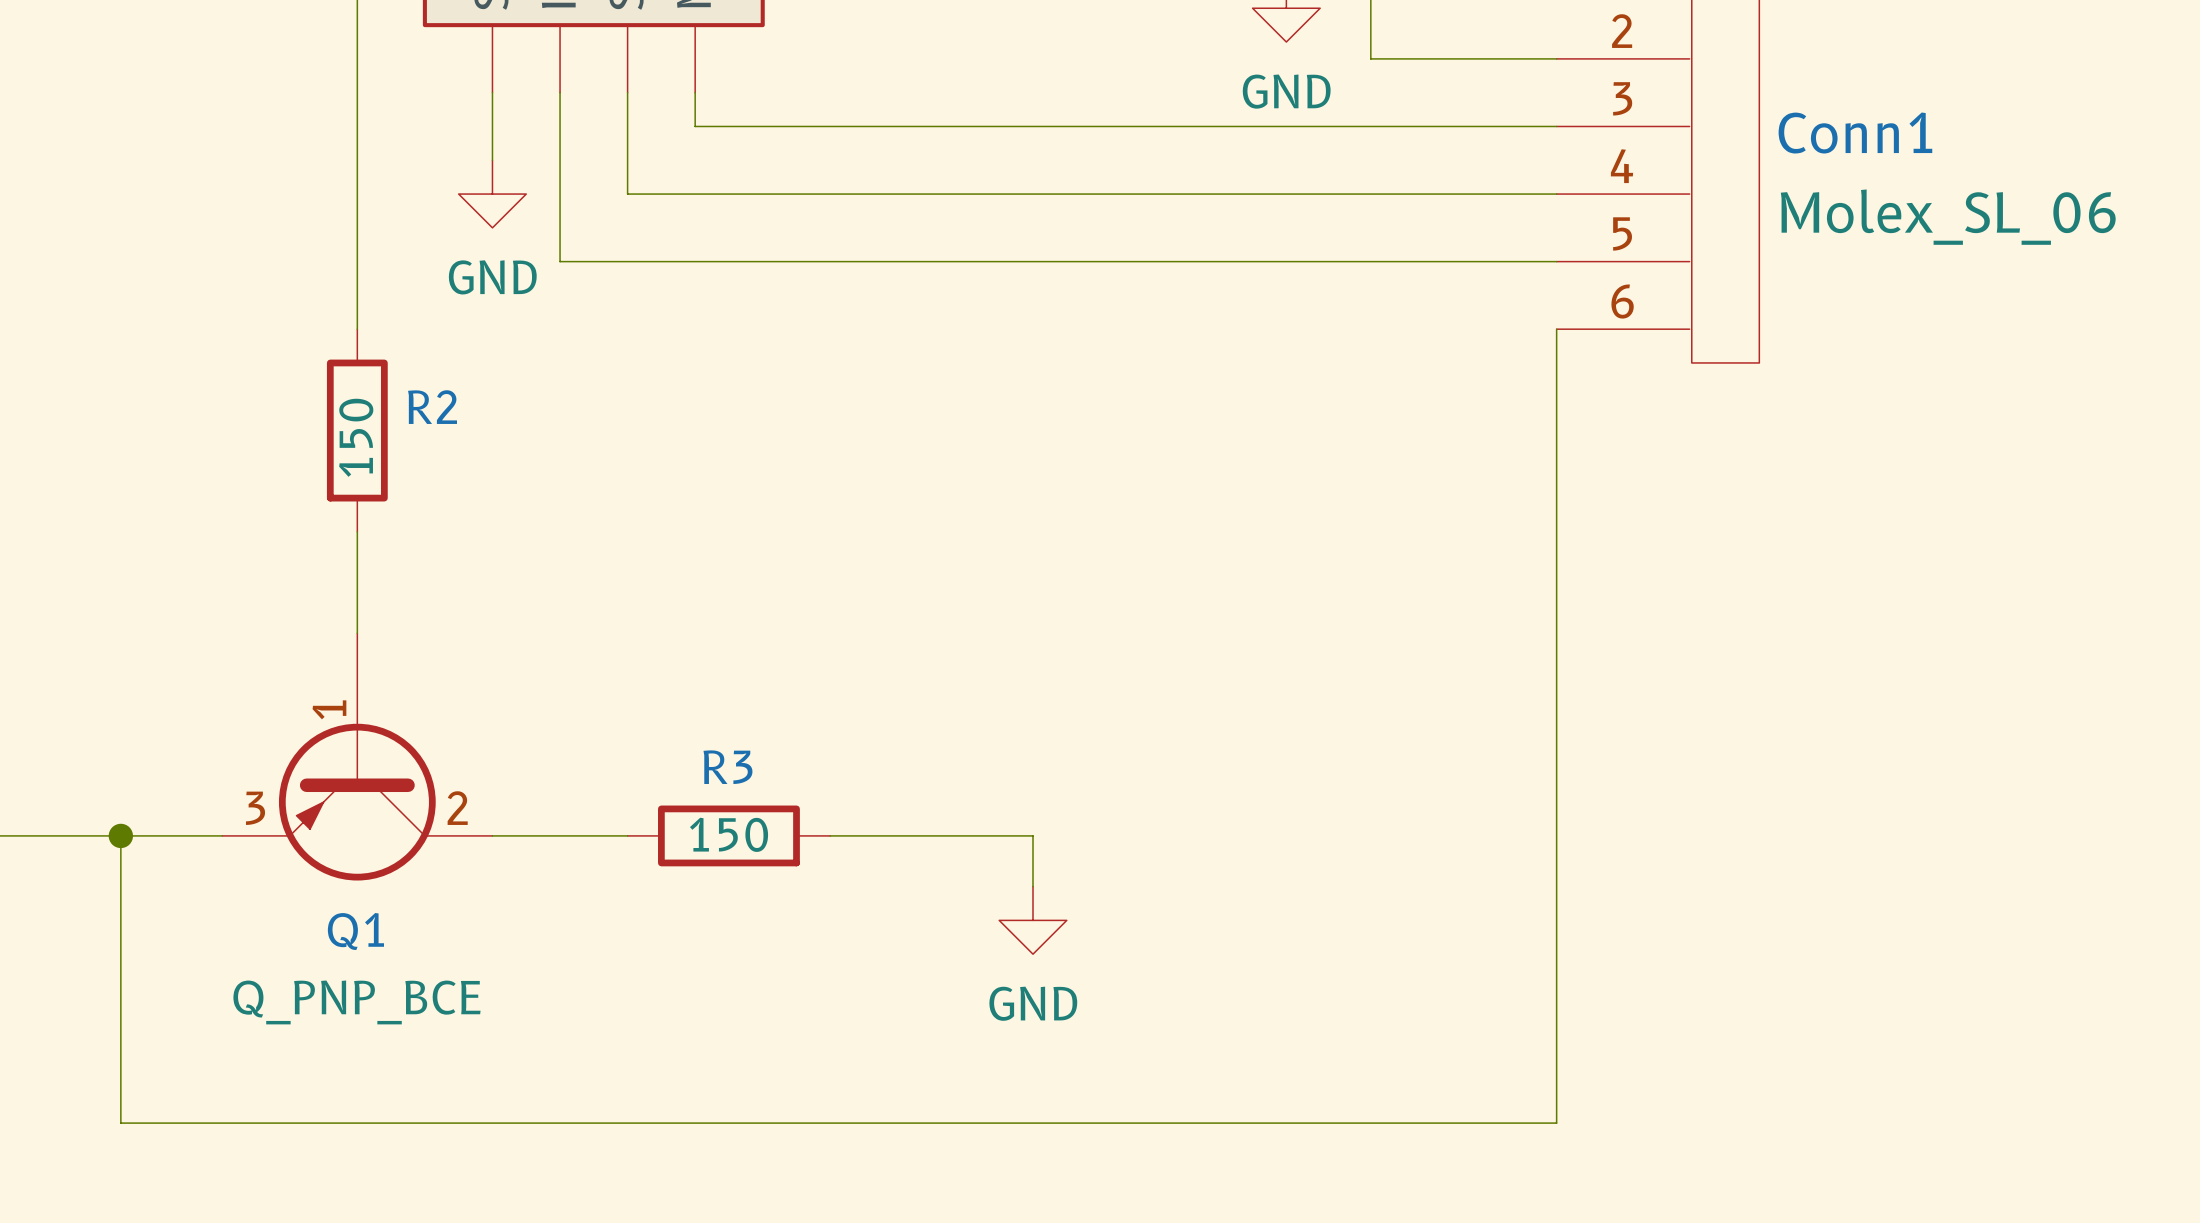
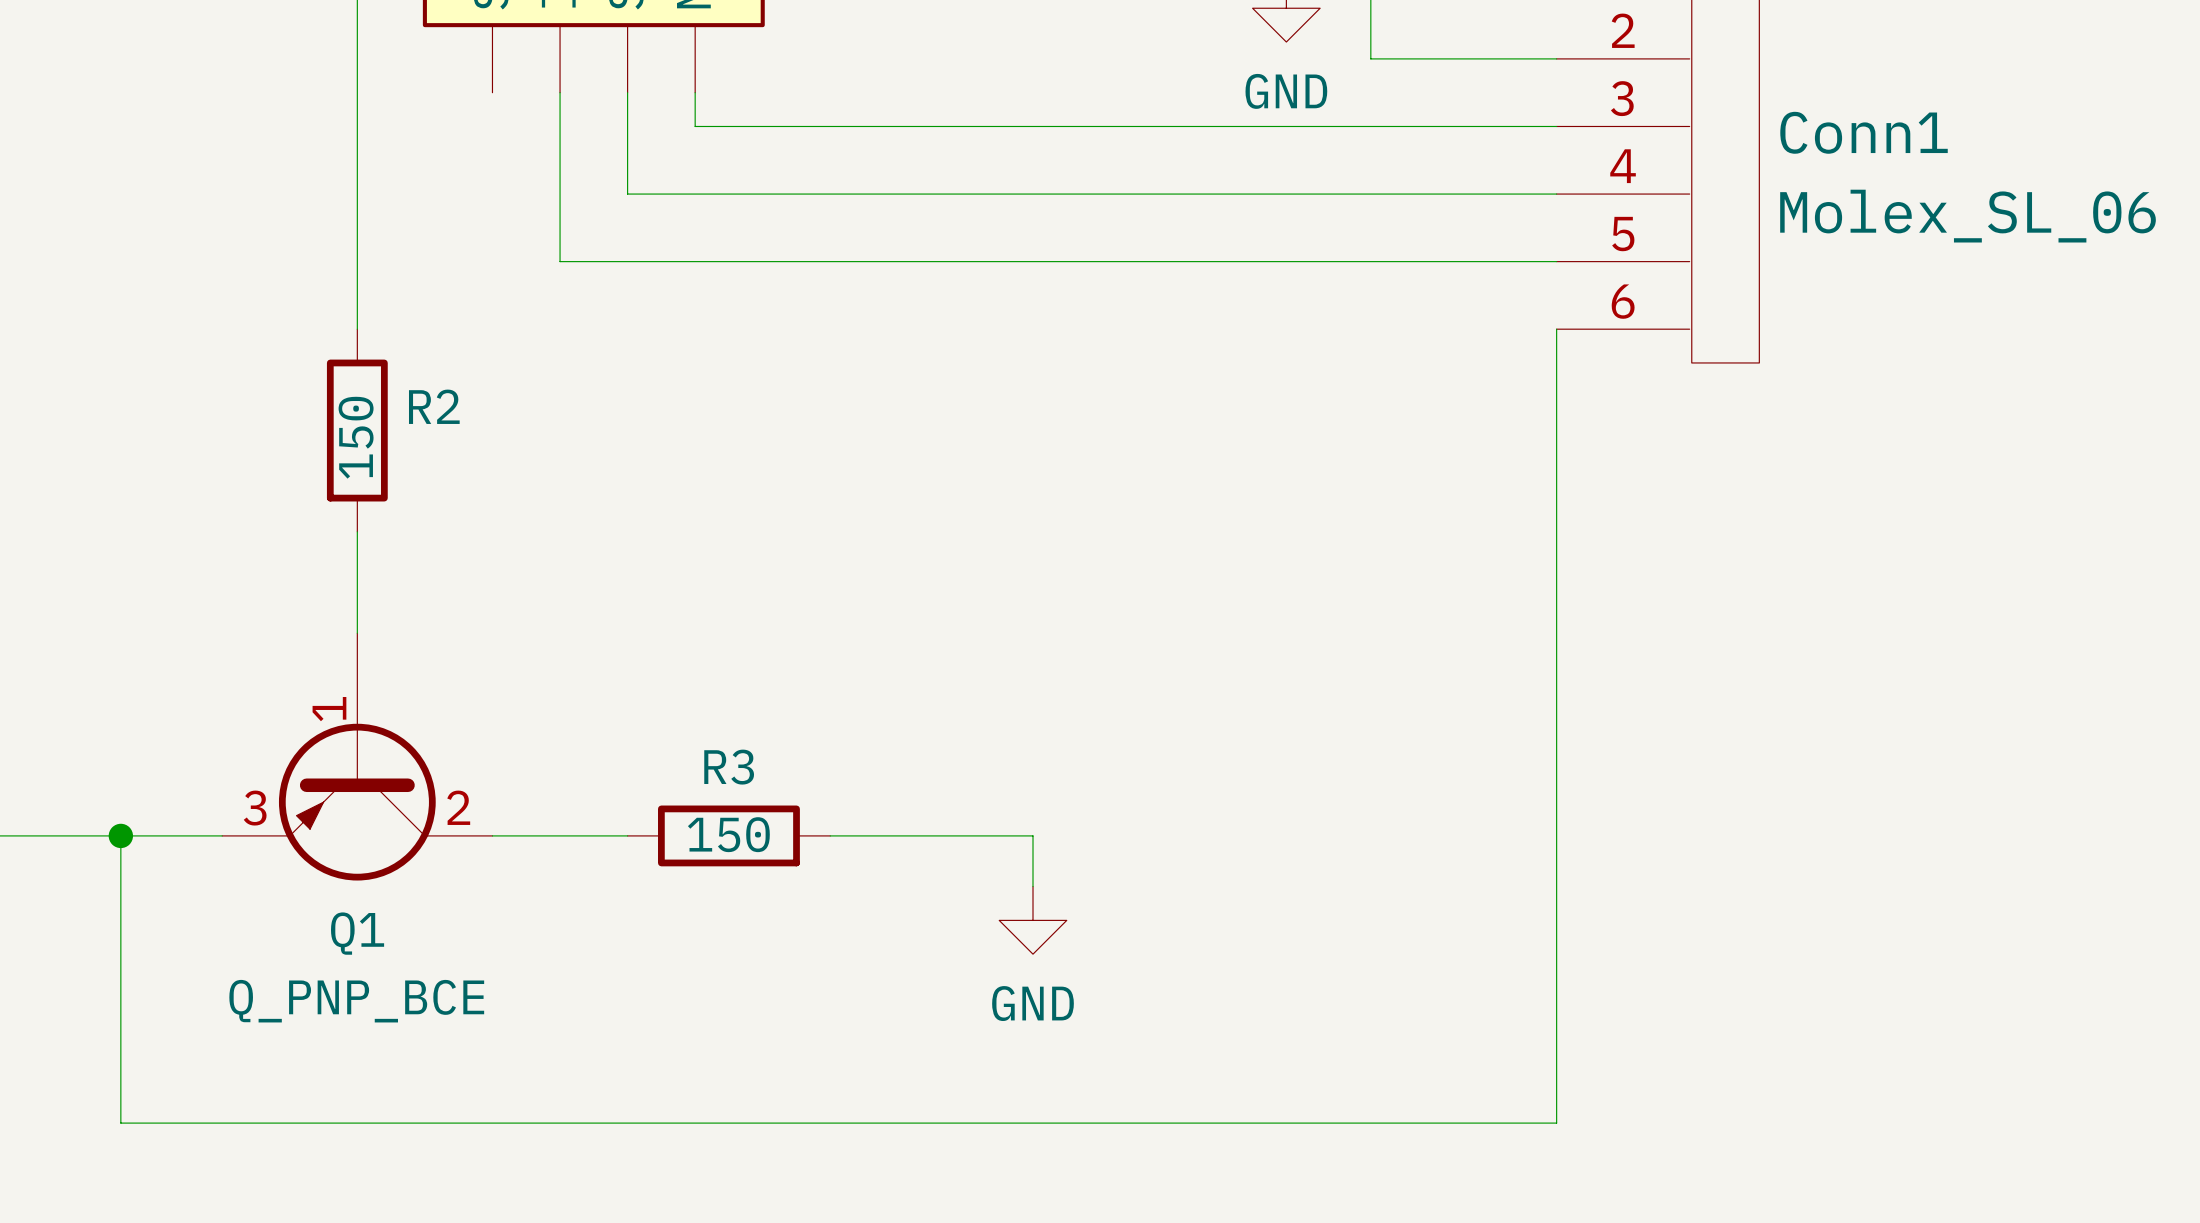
wire: (492, 92) (492, 160) -> none
power symbol: GND (492, 194) -> none

